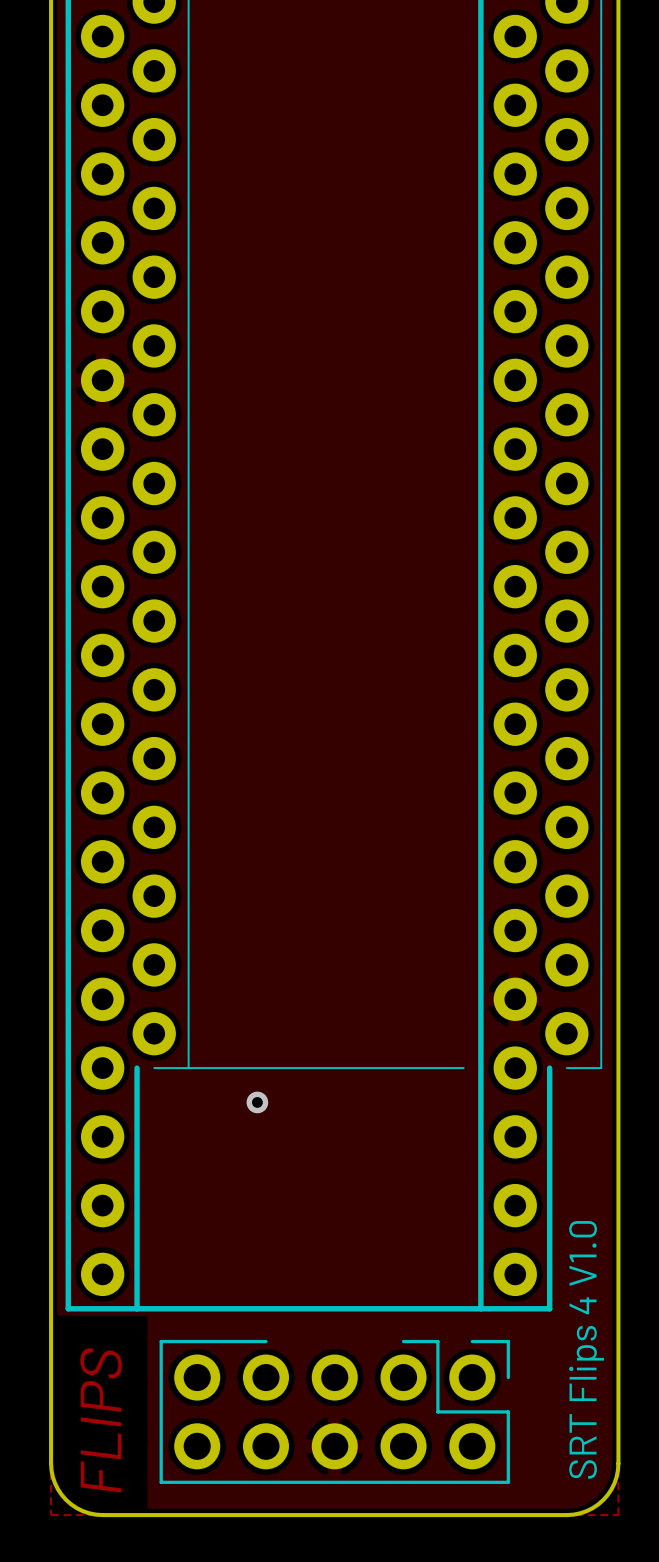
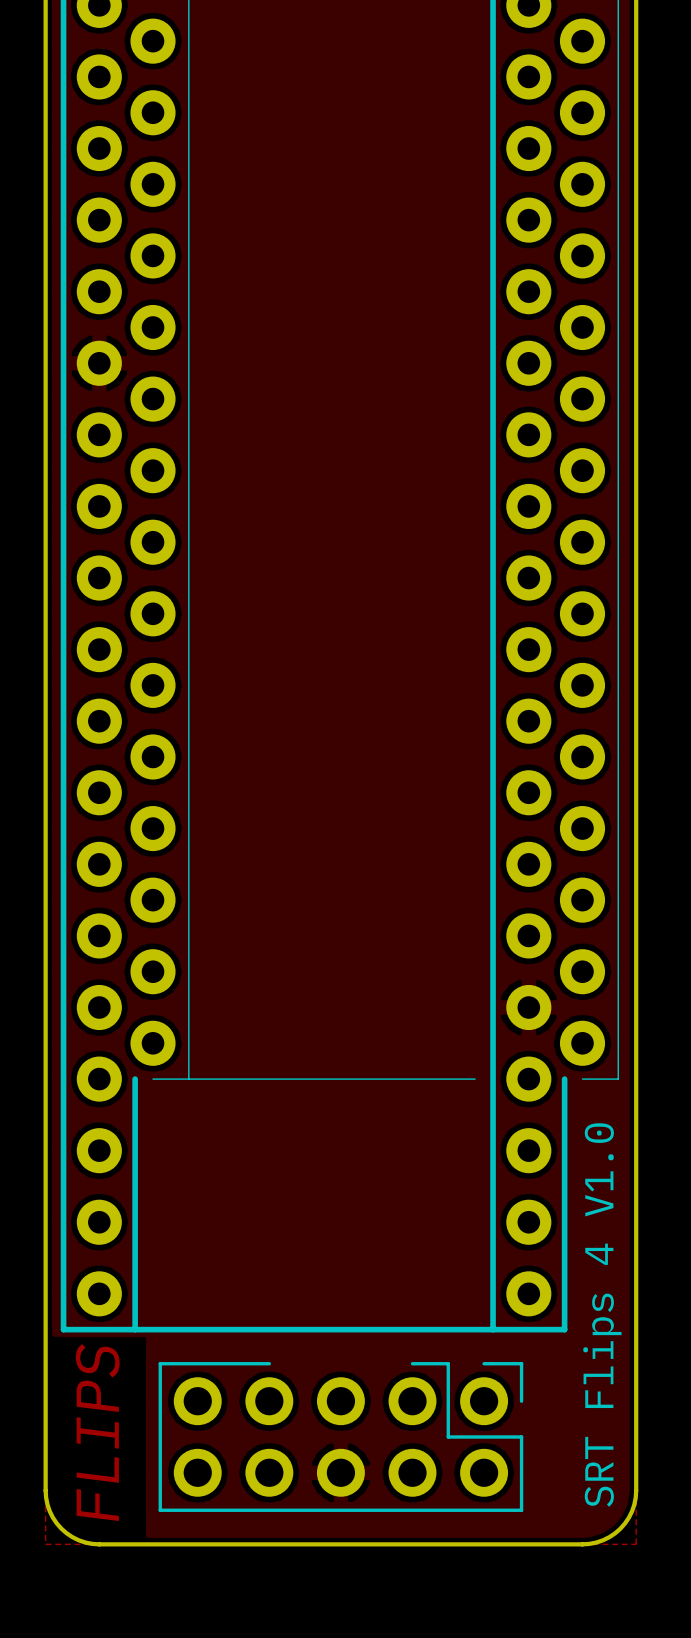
via: (257, 1102) -> none

